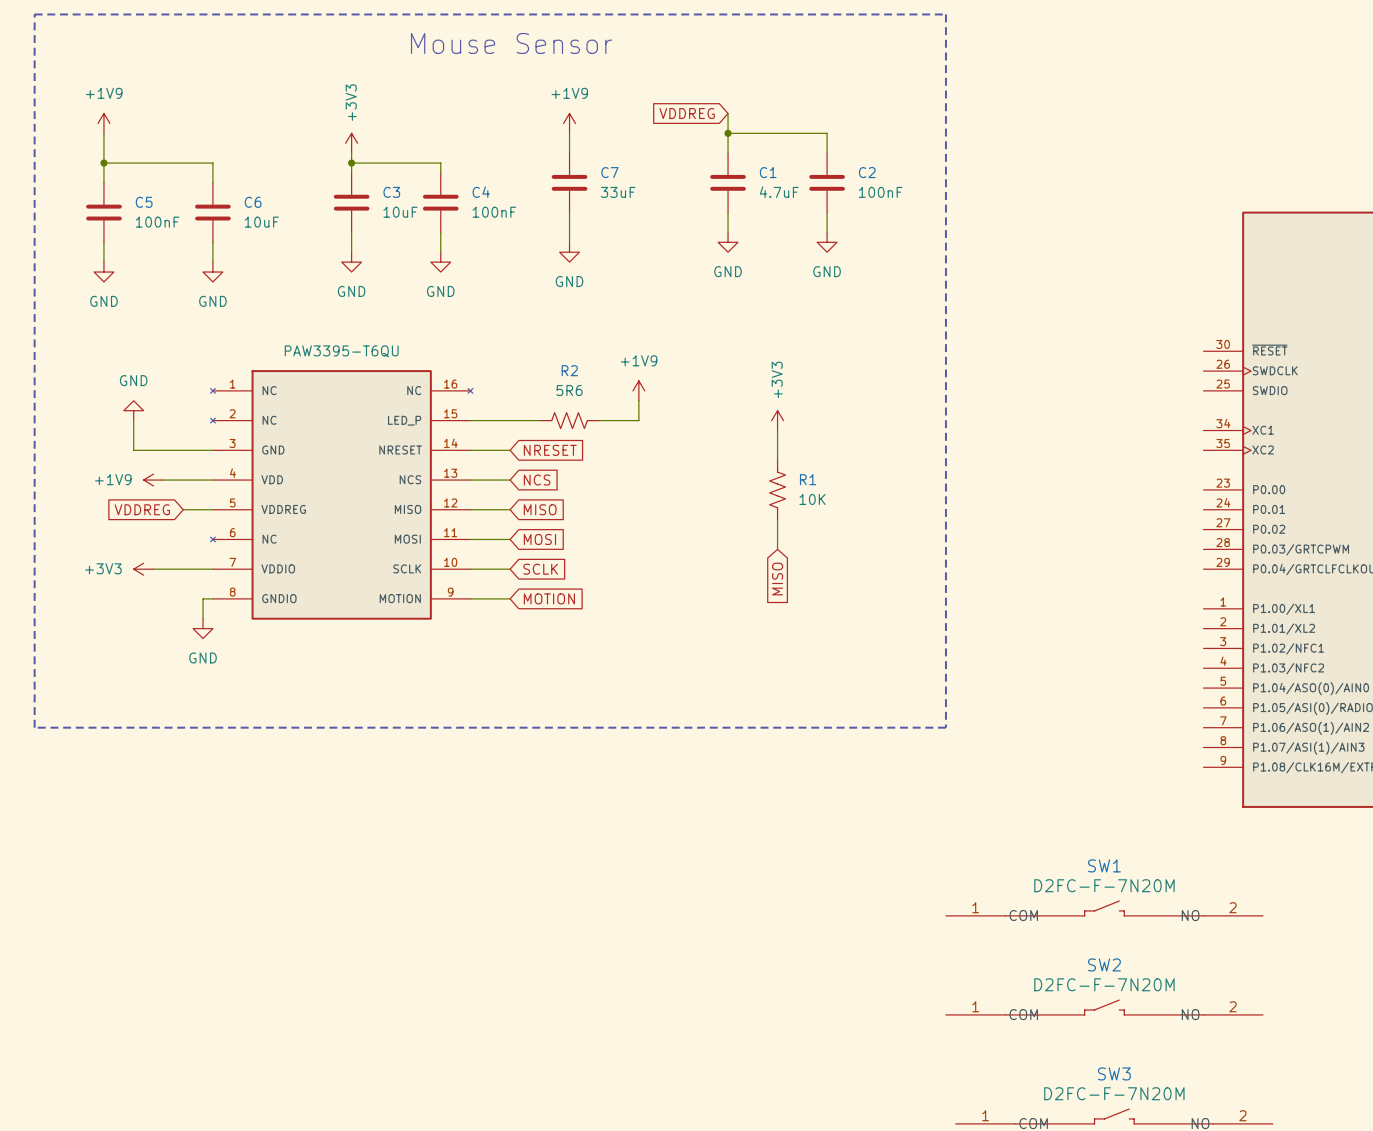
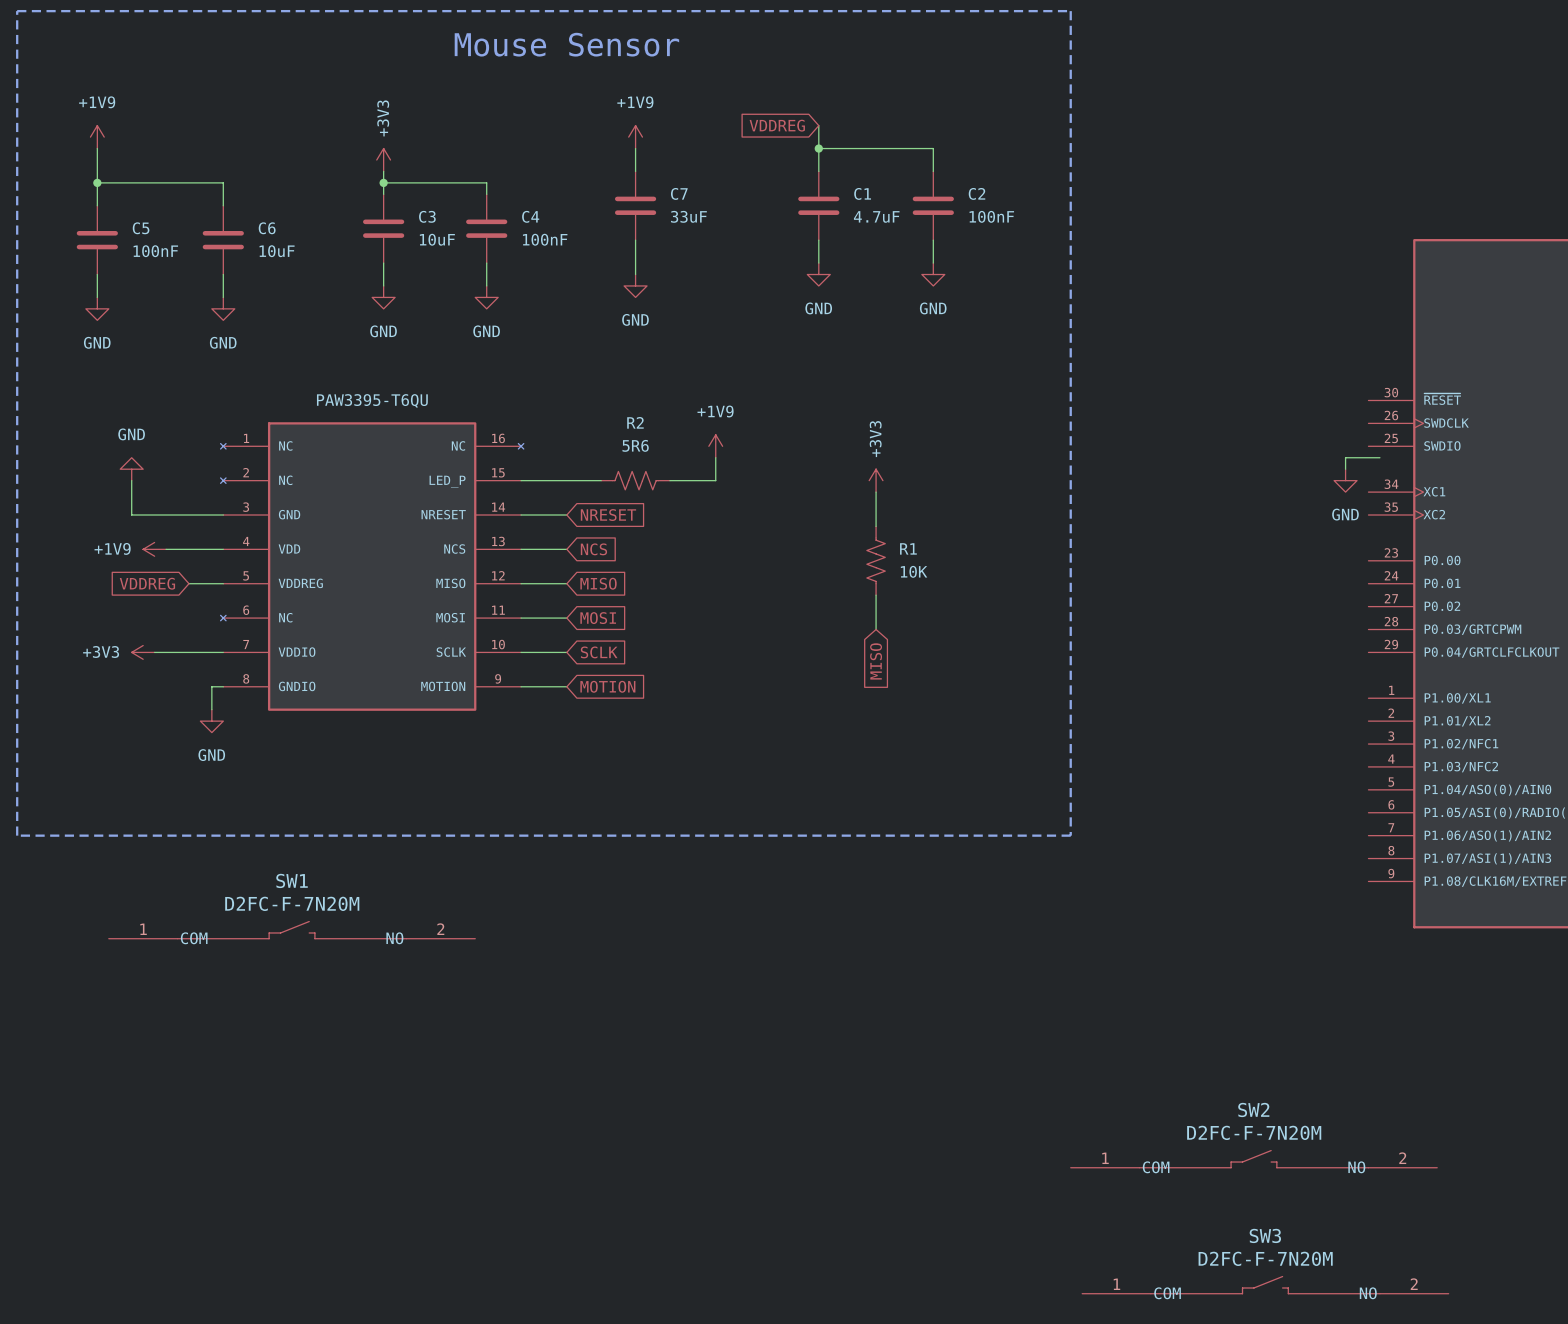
wire: none -> (1379, 457) (1345, 457) (1345, 469)
power symbol: none -> GND (1345, 480)
SW1 position: (1104, 908) -> (292, 930)

